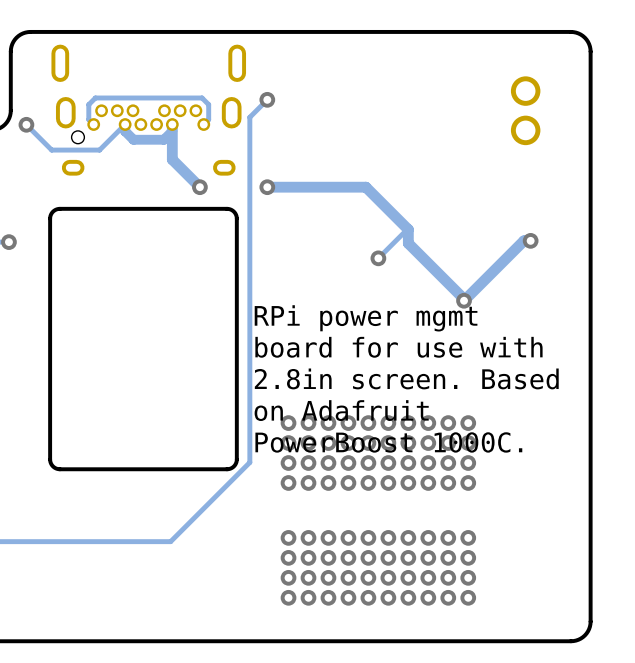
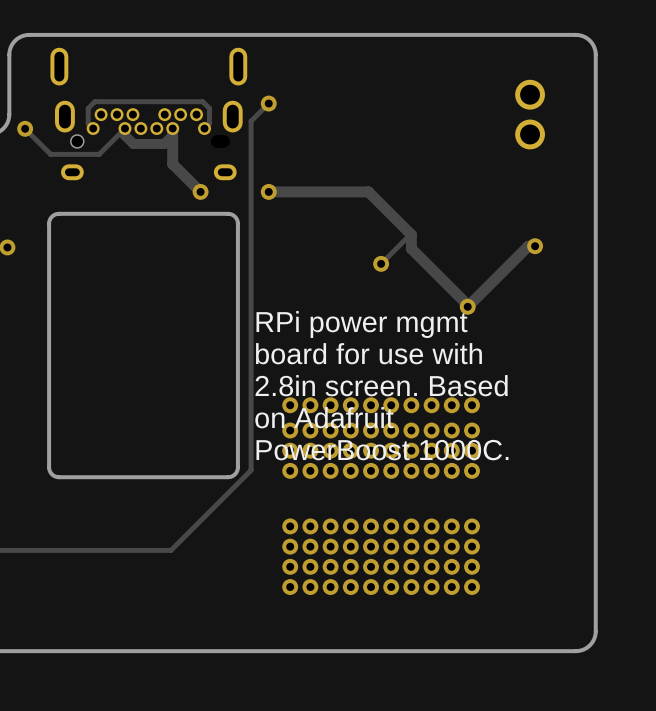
via: none -> (290, 405)
via: none -> (310, 405)
via: none -> (330, 405)
via: none -> (350, 405)
via: none -> (371, 405)
via: none -> (391, 405)
via: none -> (411, 405)
via: none -> (431, 405)
via: none -> (451, 405)
via: none -> (471, 405)
via: (288, 482) -> none
via: (308, 482) -> none
via: (328, 482) -> none
via: (348, 482) -> none
via: (368, 482) -> none
via: (388, 482) -> none
via: (408, 482) -> none
via: (428, 482) -> none
via: (448, 482) -> none
via: (468, 482) -> none
via: none -> (290, 526)
via: none -> (310, 526)
via: none -> (330, 526)
via: none -> (350, 526)
via: none -> (371, 526)
via: none -> (391, 526)
via: none -> (411, 526)
via: none -> (431, 526)
via: none -> (451, 526)
via: none -> (471, 526)
via: (288, 597) -> none
via: (308, 597) -> none
via: (328, 597) -> none
via: (348, 597) -> none
via: (368, 597) -> none
via: (388, 597) -> none
via: (408, 597) -> none
via: (428, 597) -> none
via: (448, 597) -> none
via: (468, 597) -> none

